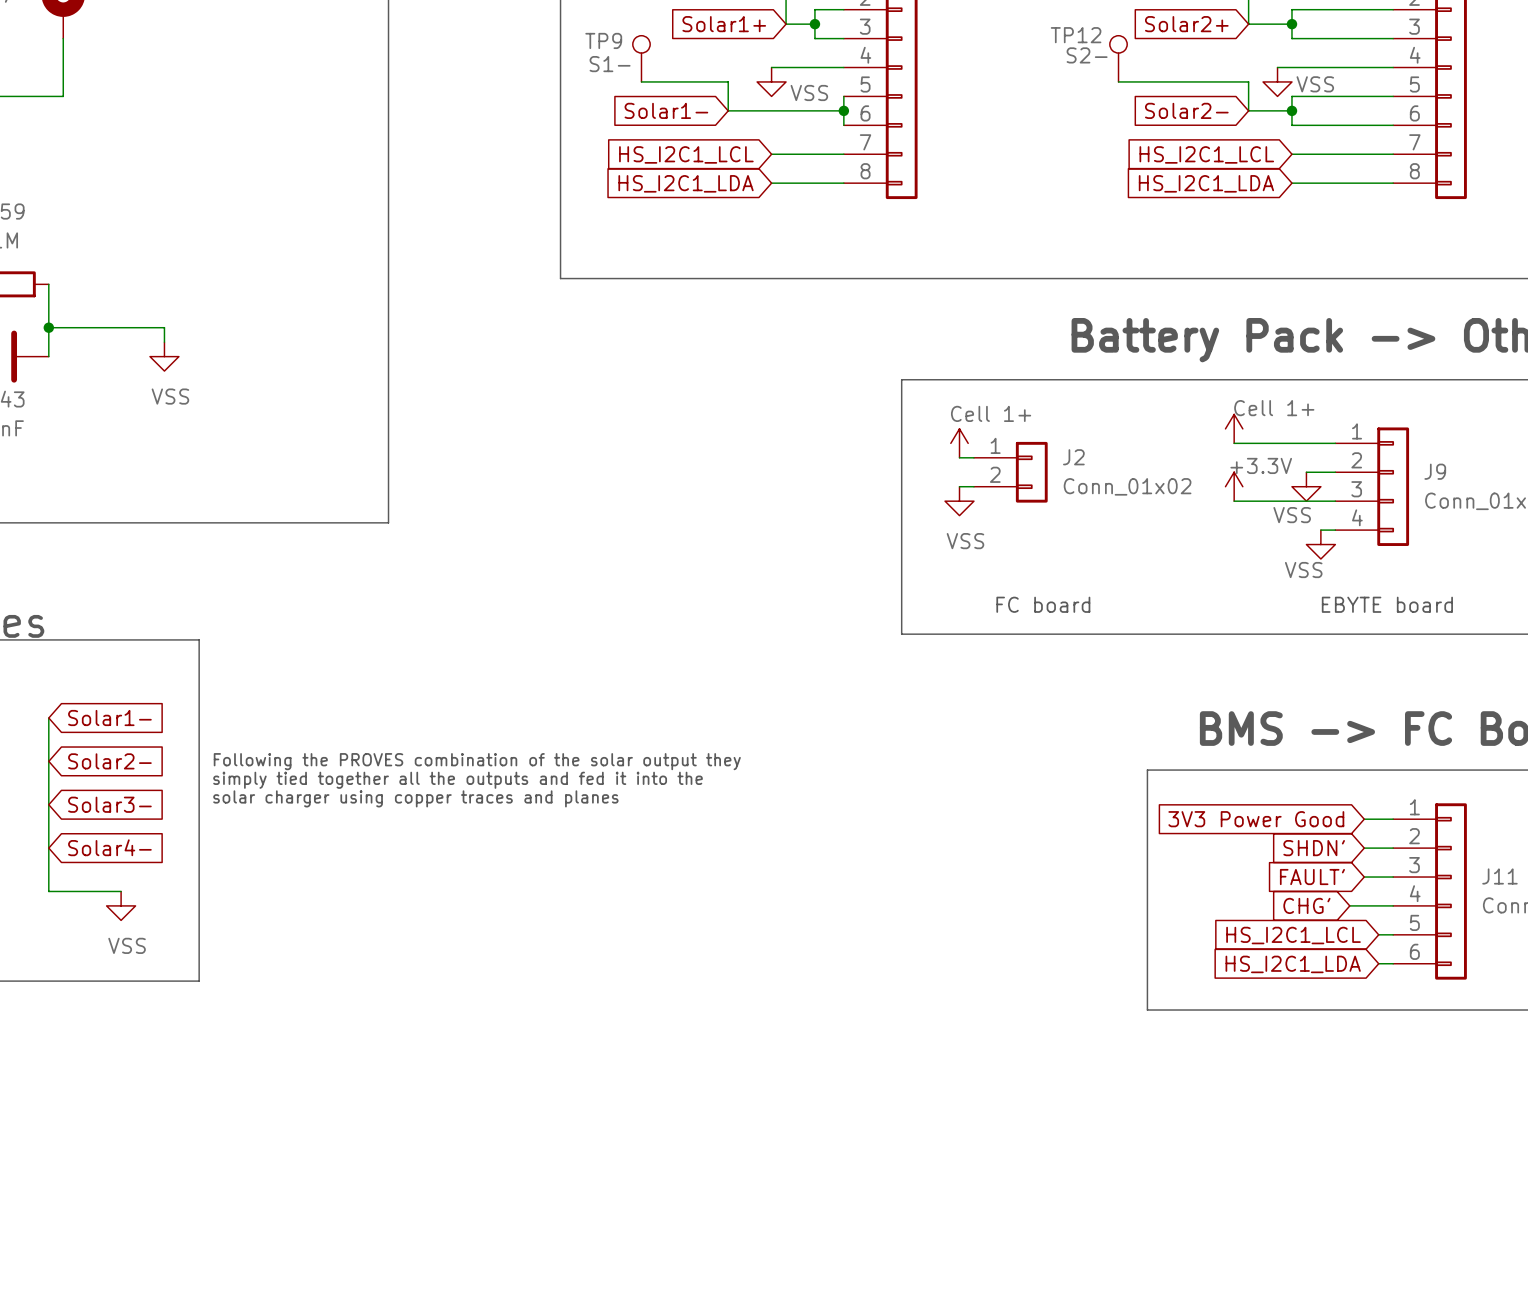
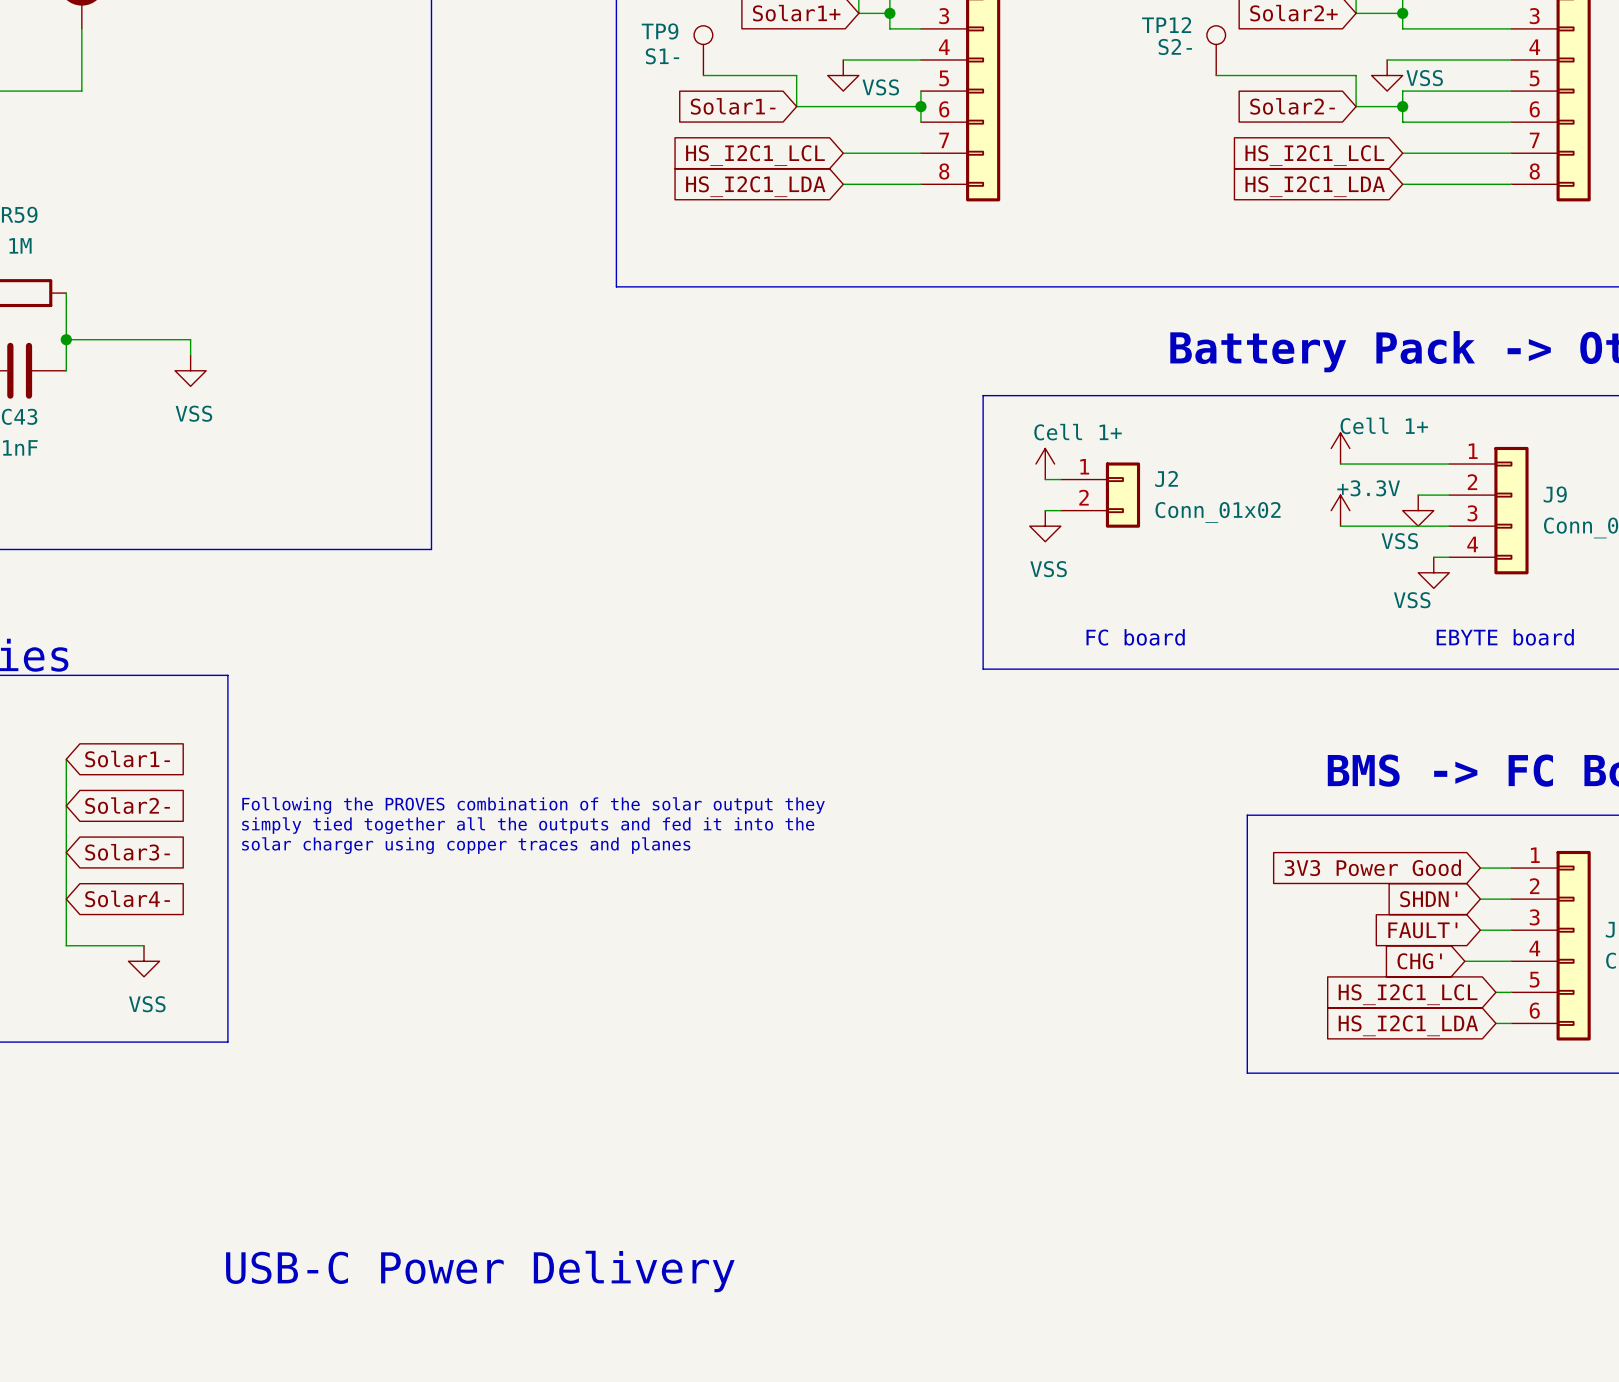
text: none -> USB-C Power Delivery (480, 1271)

